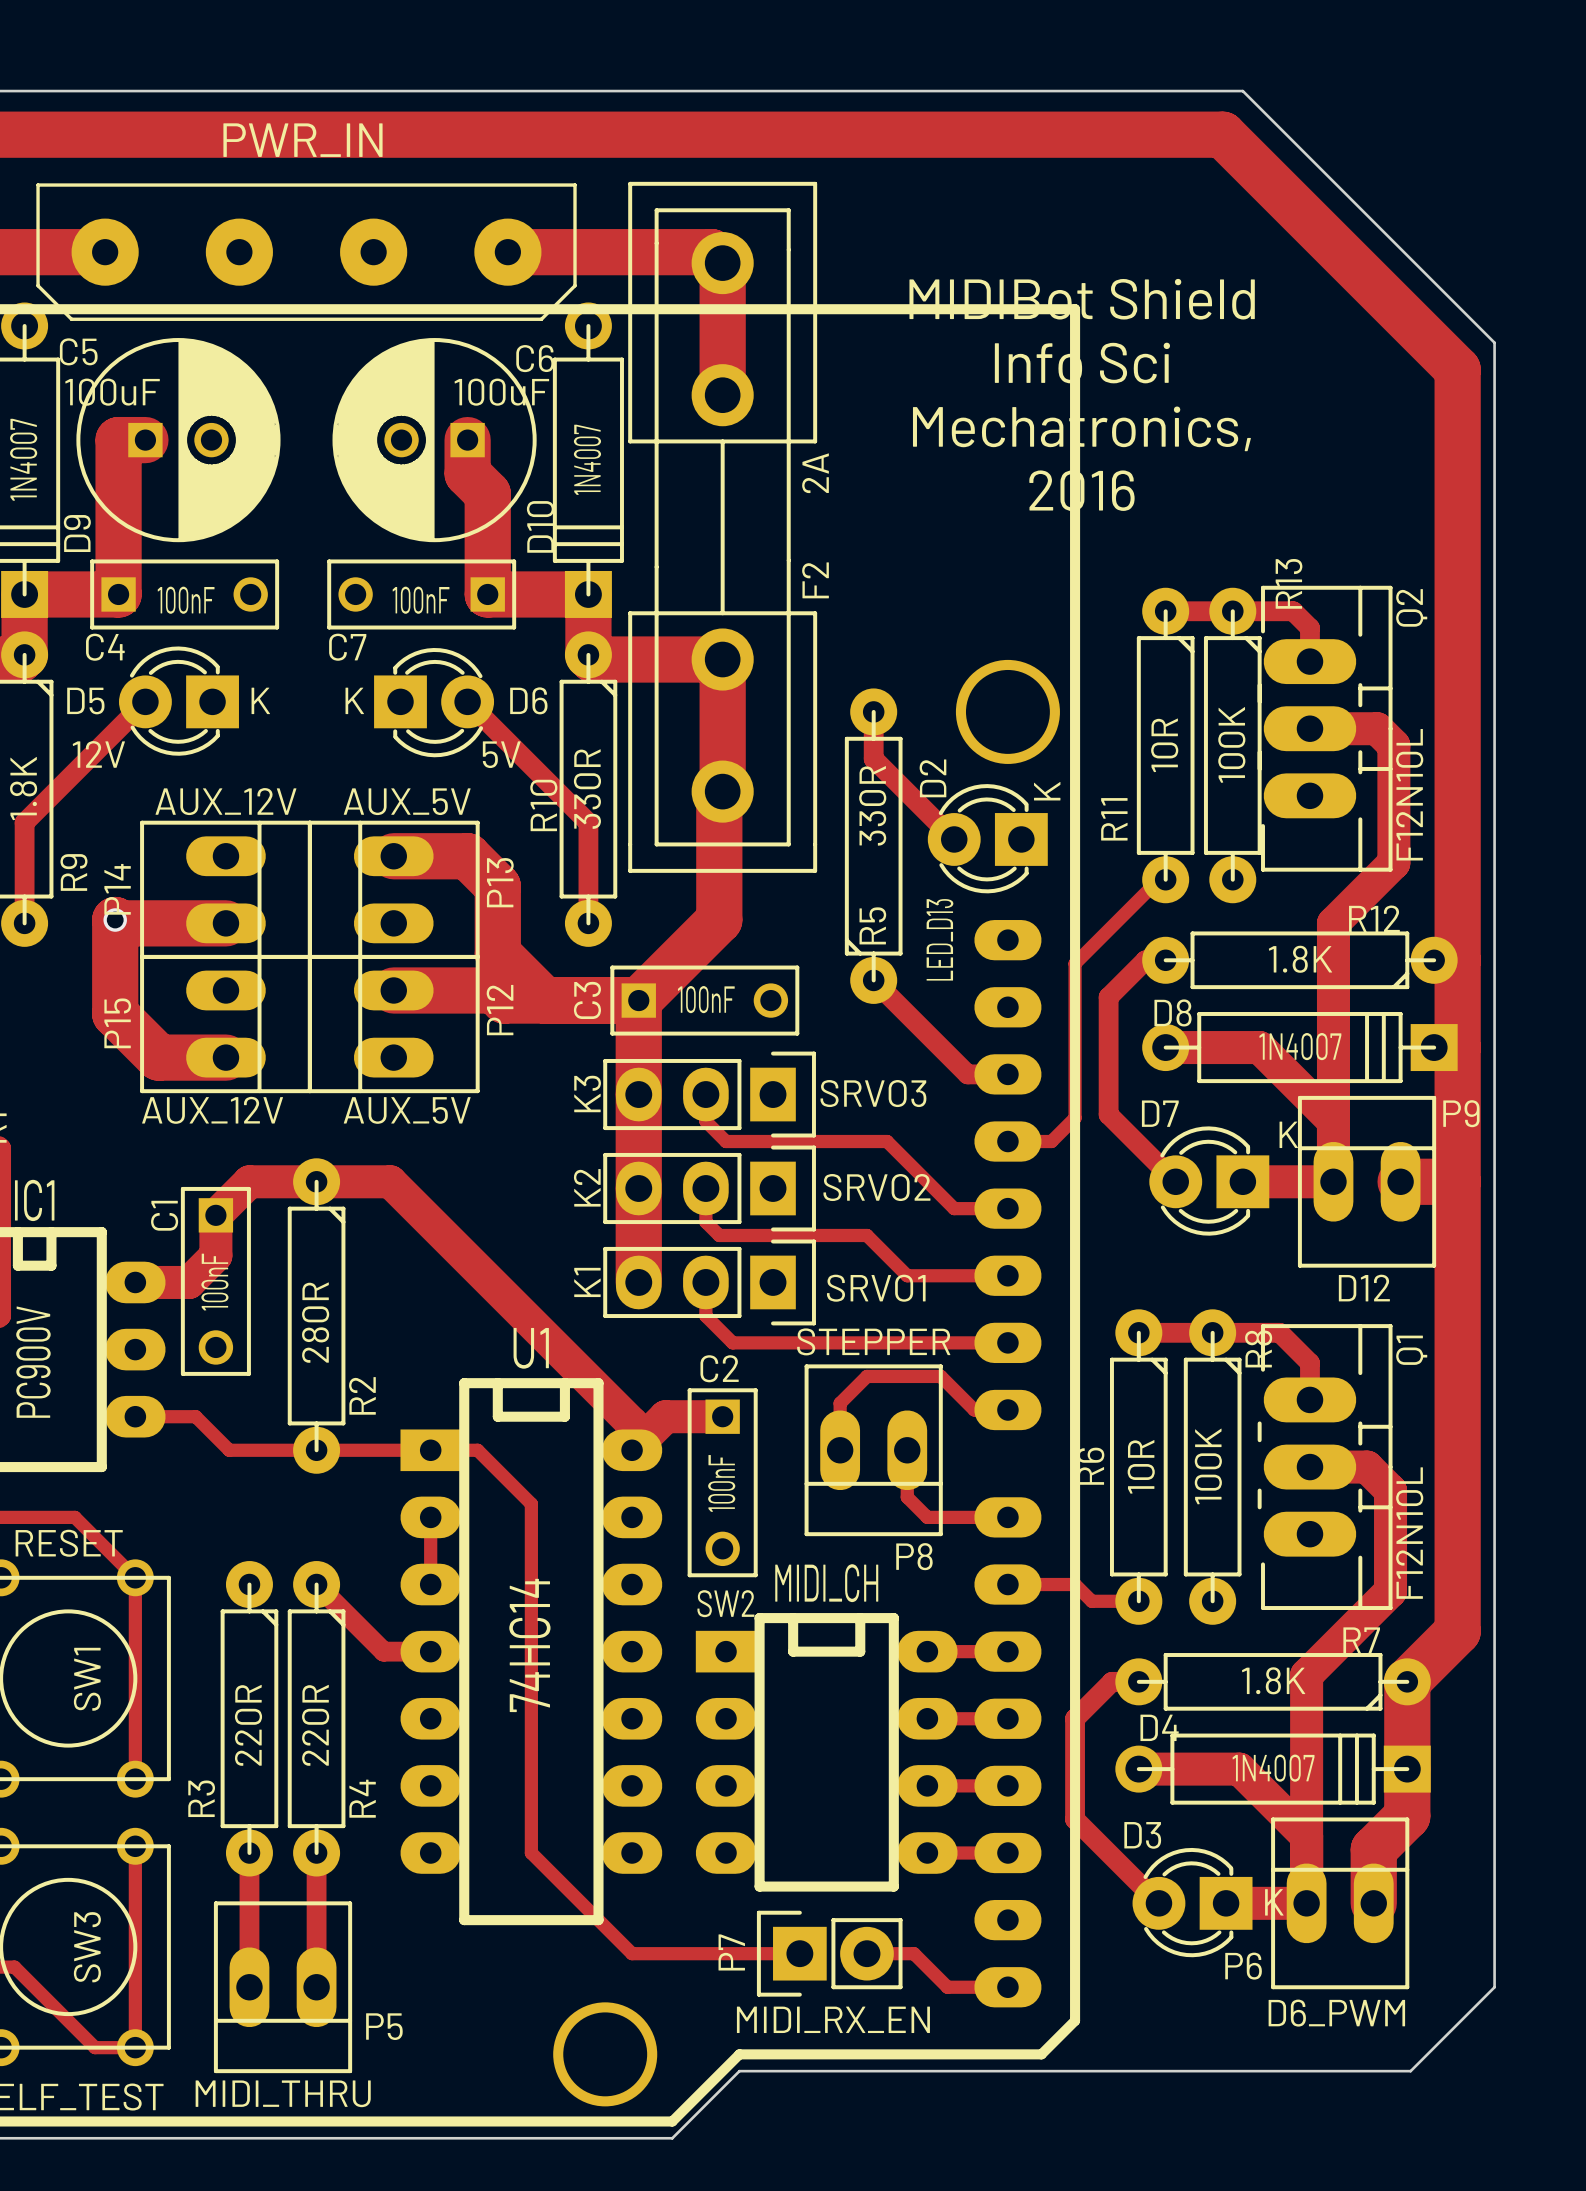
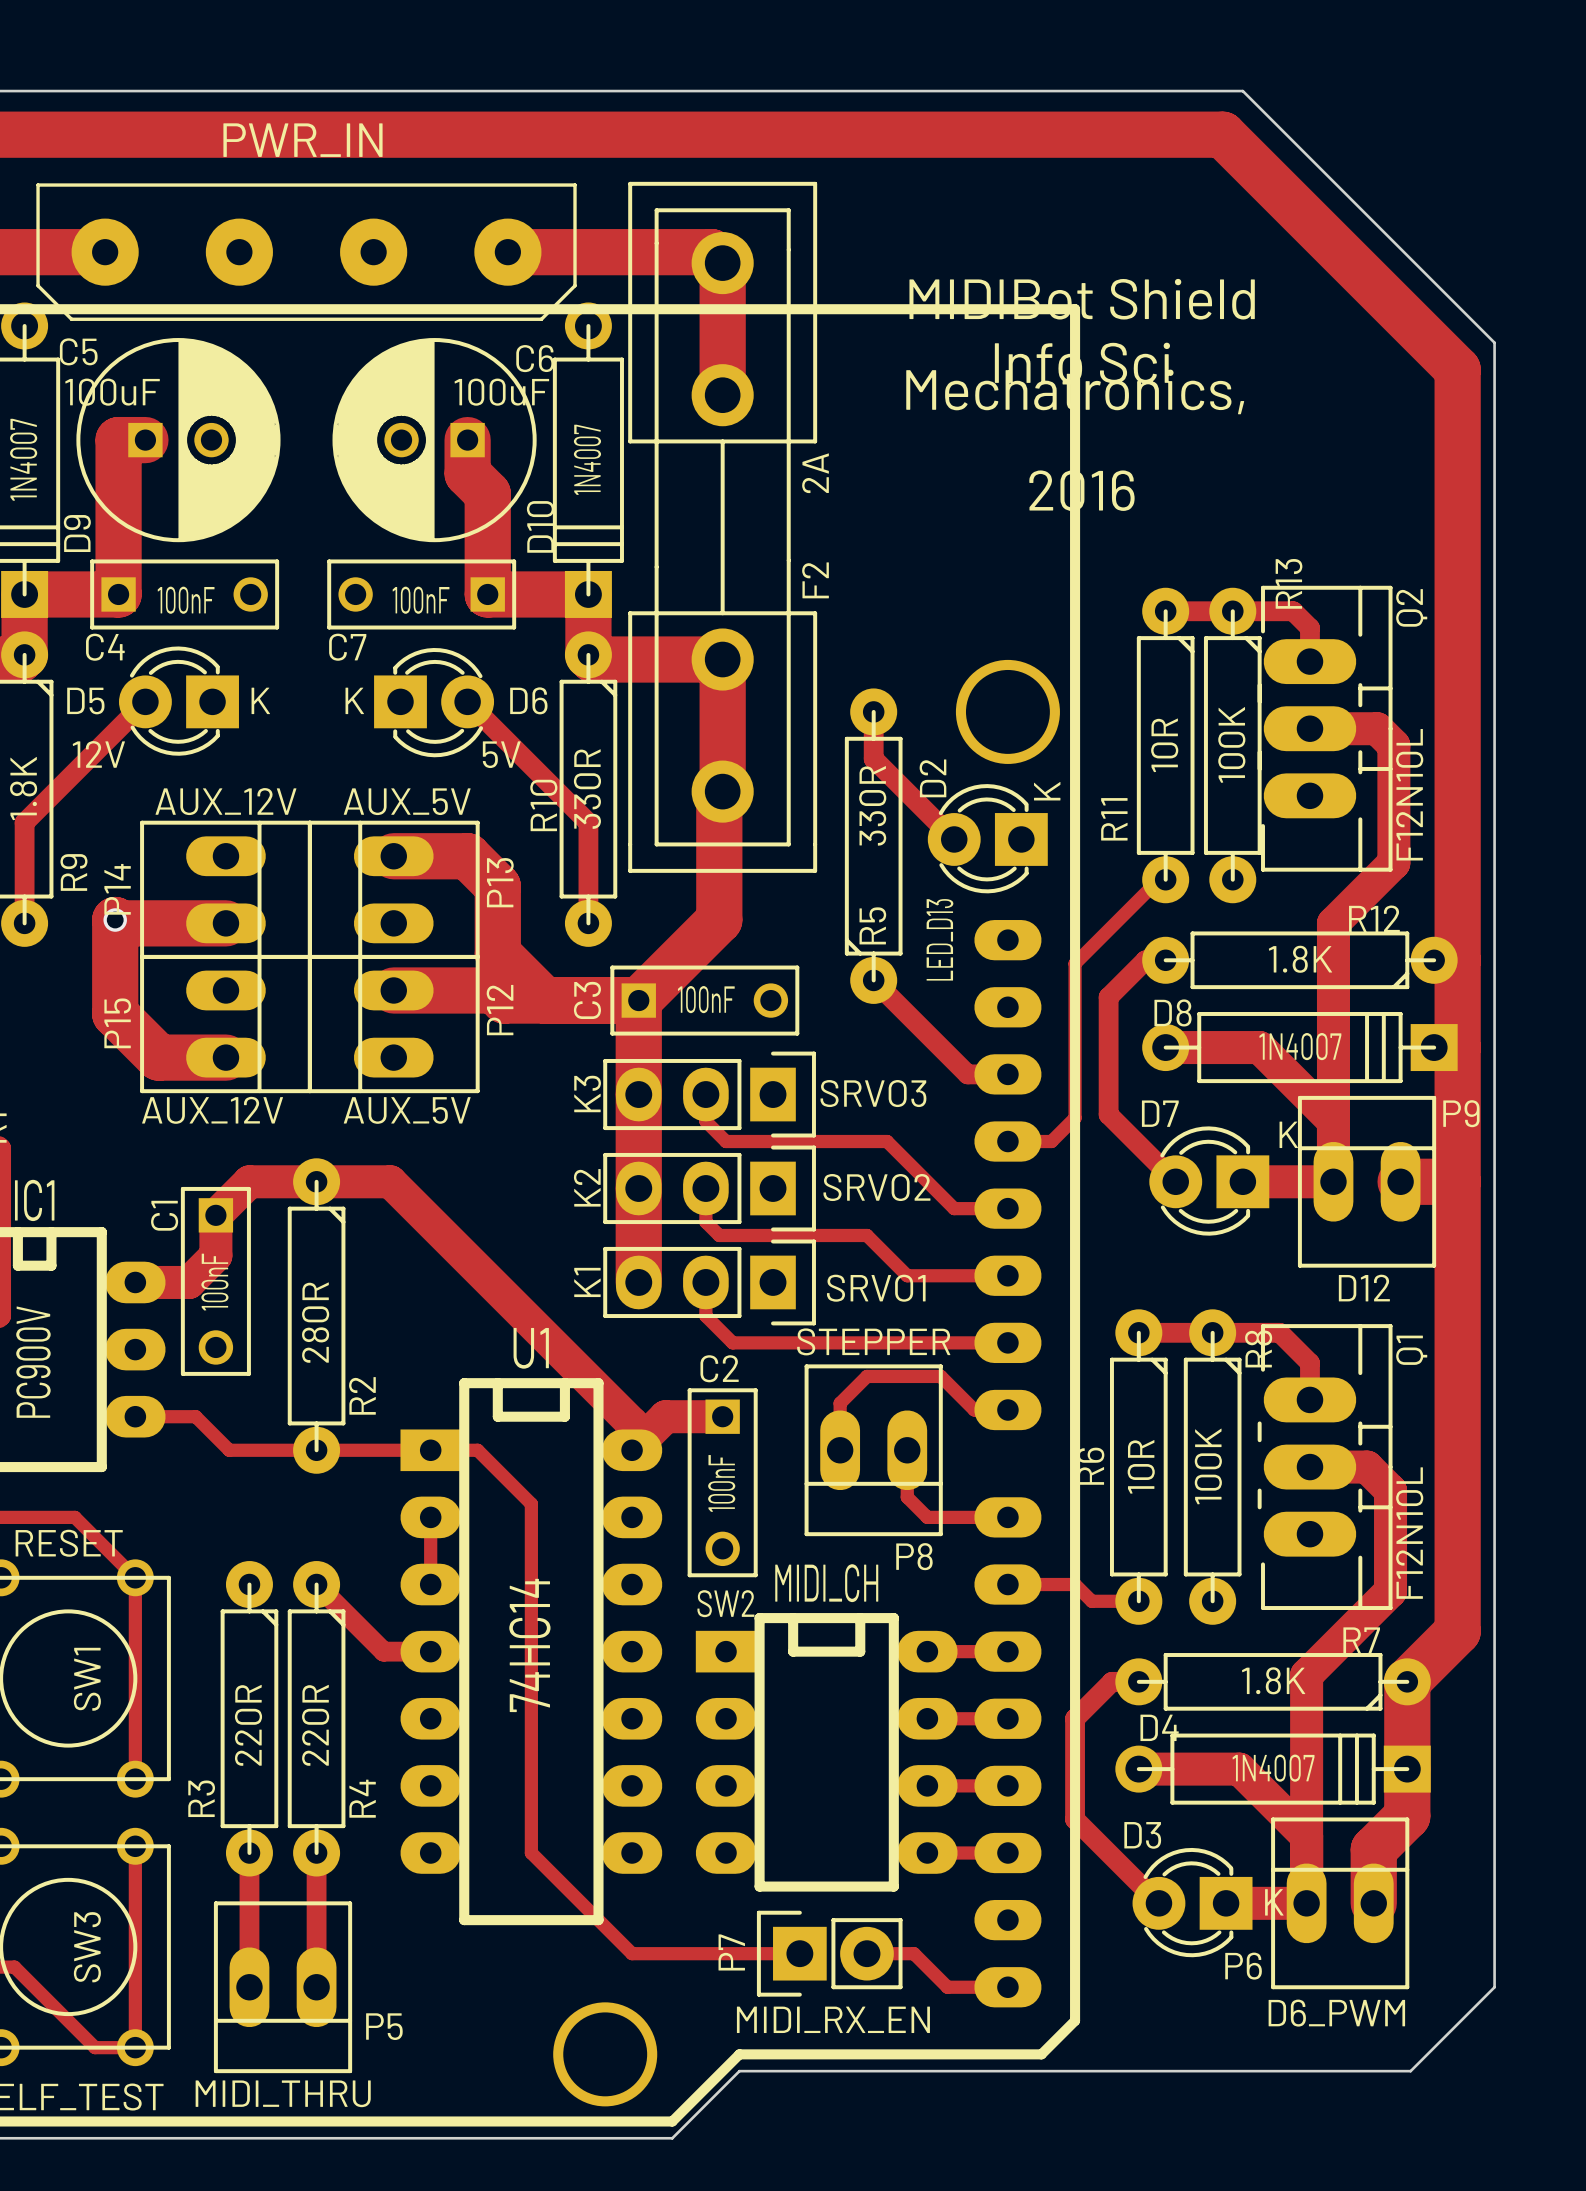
text position: Mechatronics, (1081, 428) -> Mechatronics, (1075, 391)

